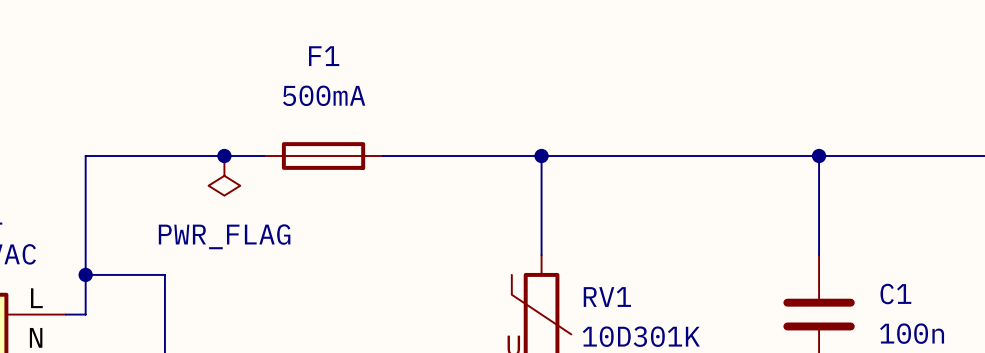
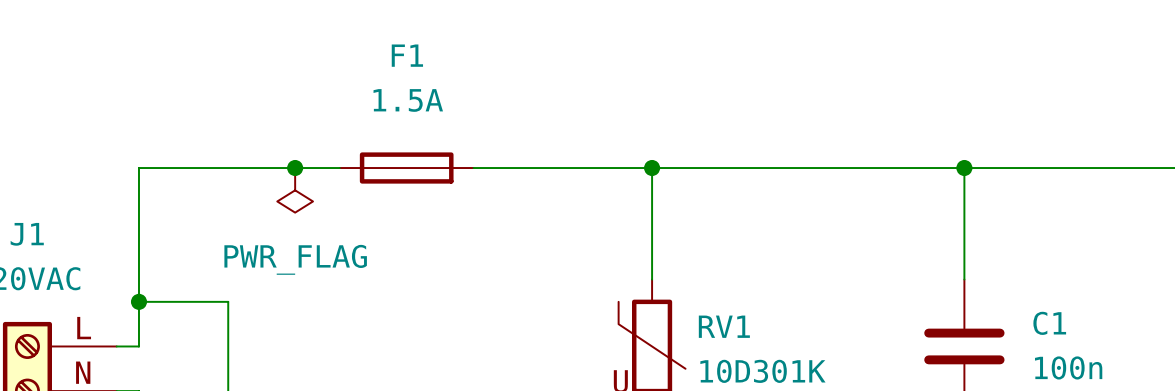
F1 value: 500mA (324, 95) -> 1.5A (408, 100)

